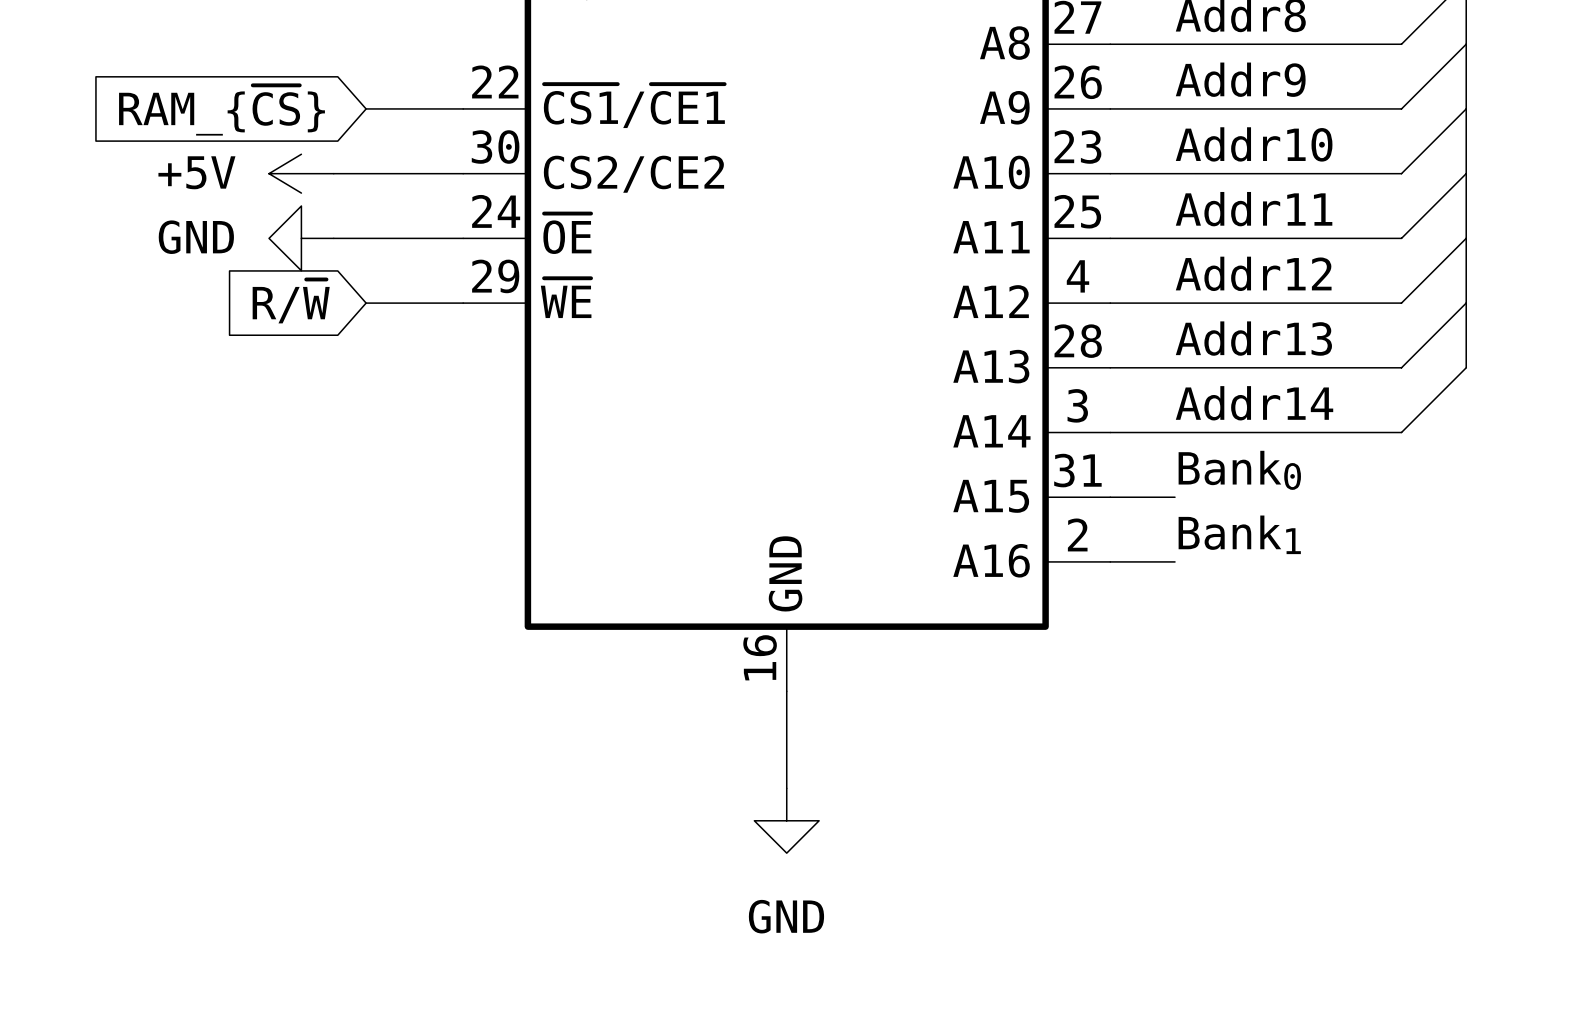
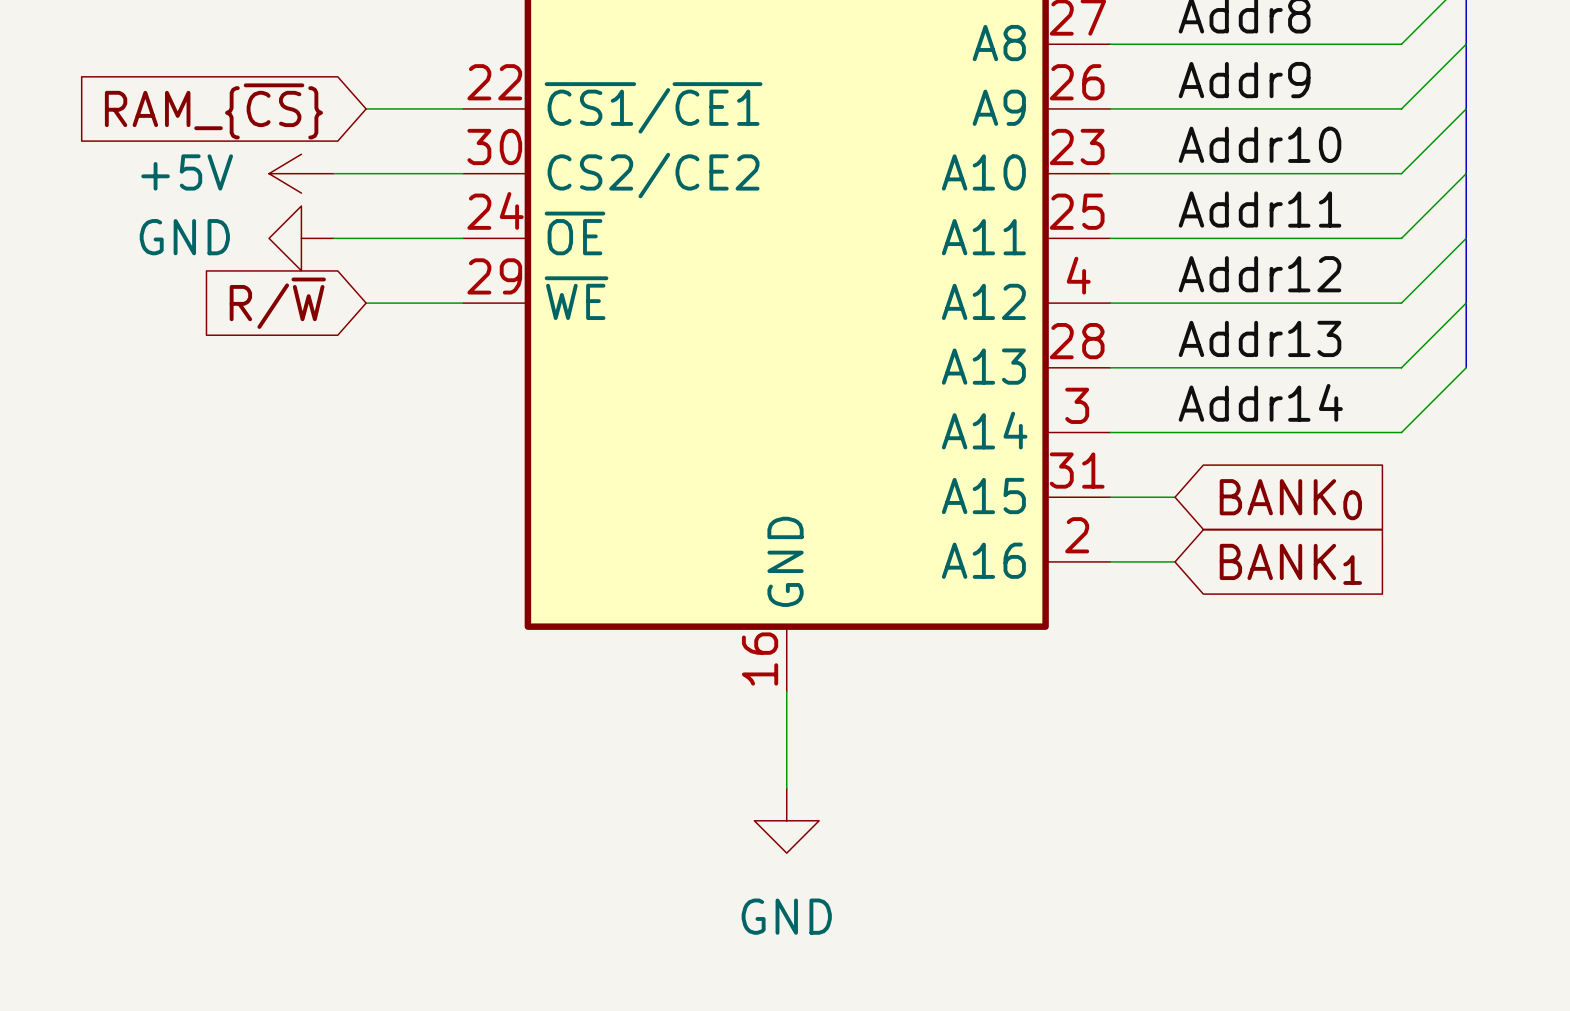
label: Bank0 (1239, 470) -> none
global label: none -> BANK0 (1290, 499)
label: Bank1 (1239, 534) -> none
global label: none -> BANK1 (1290, 564)

